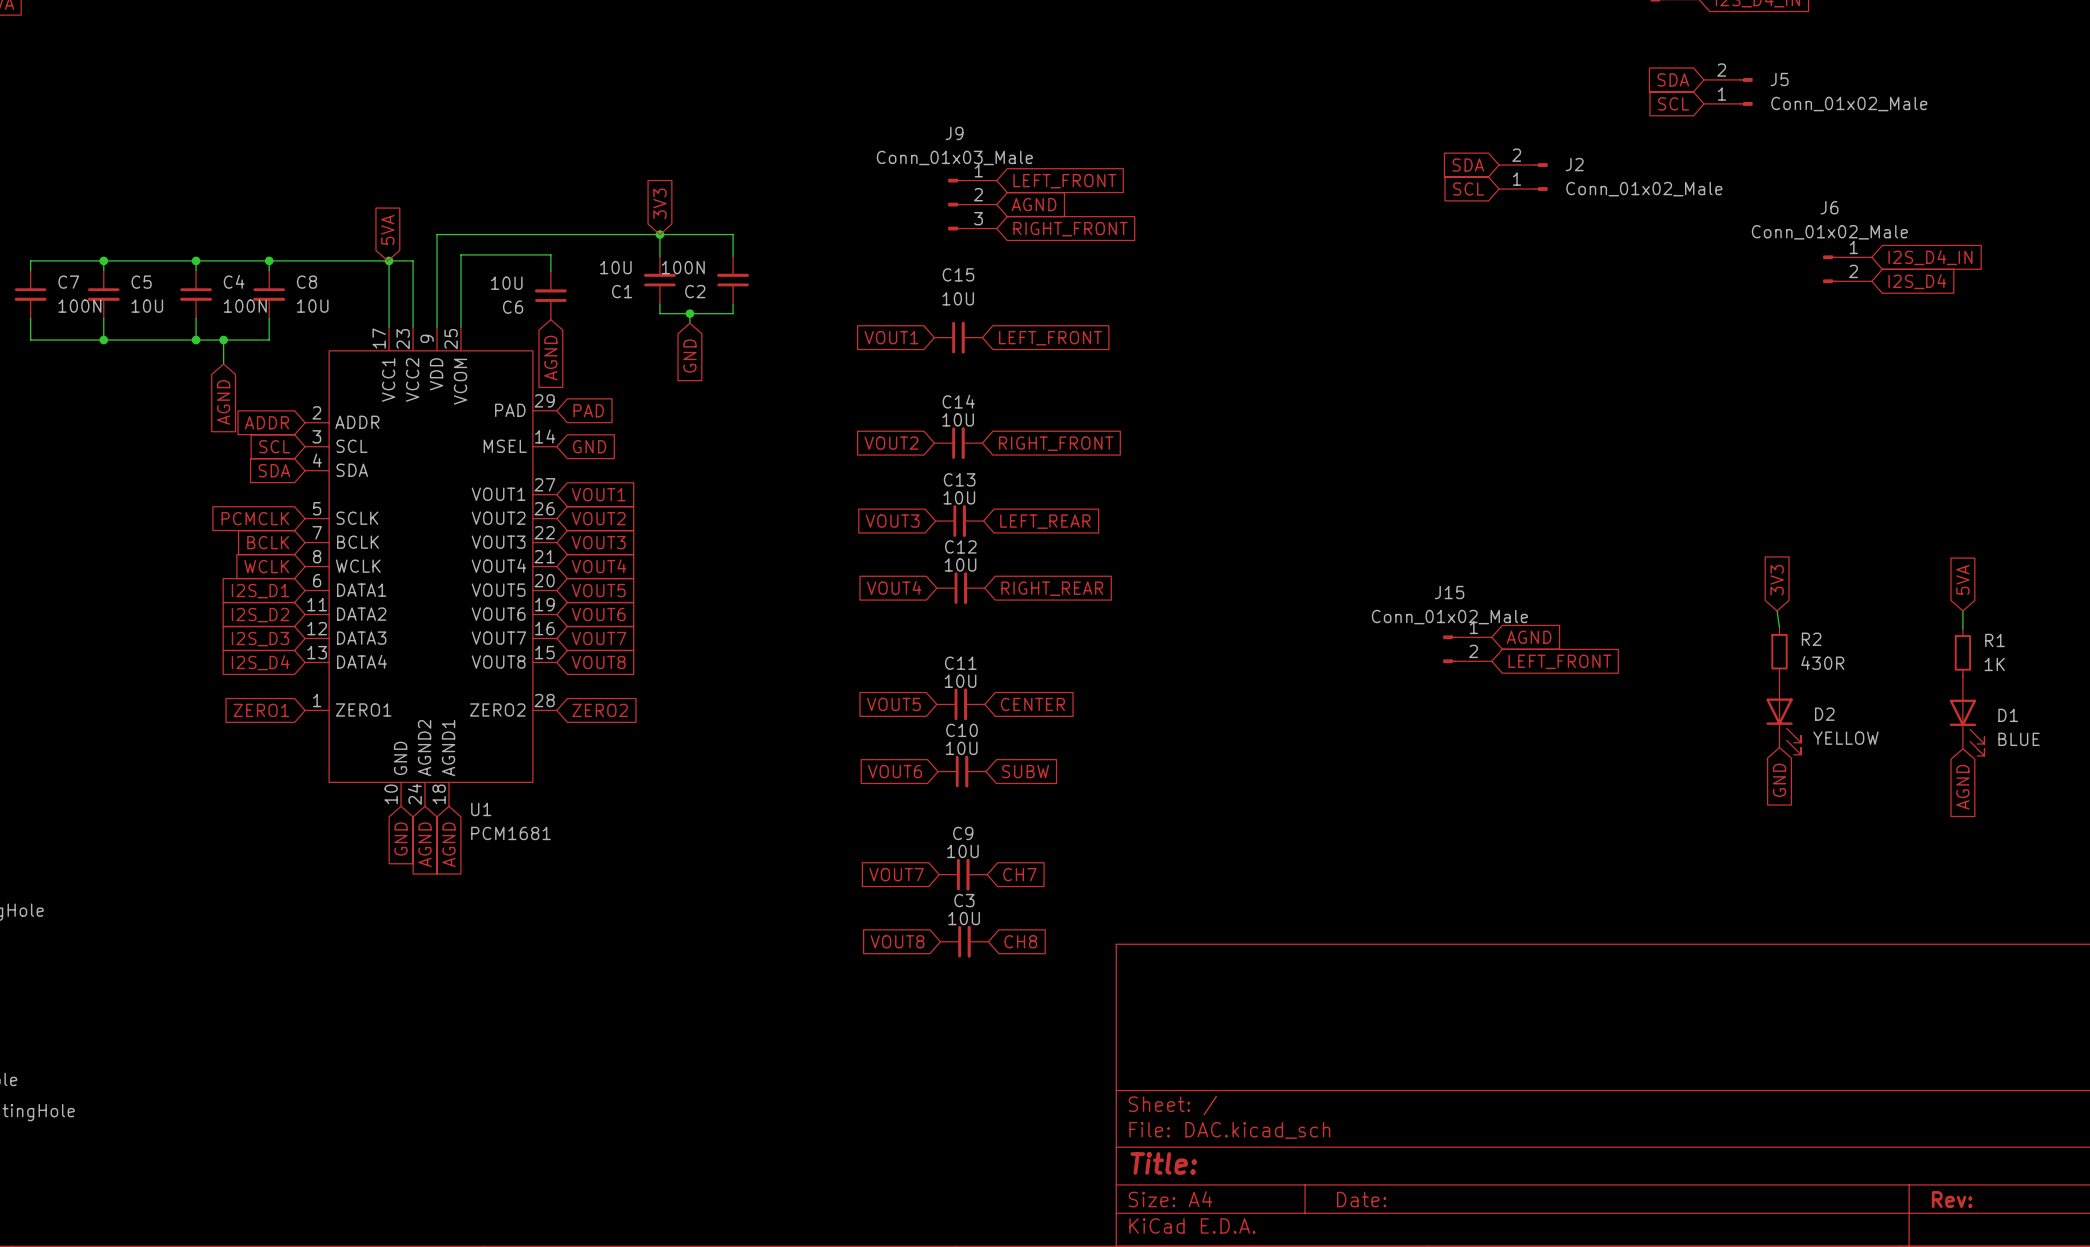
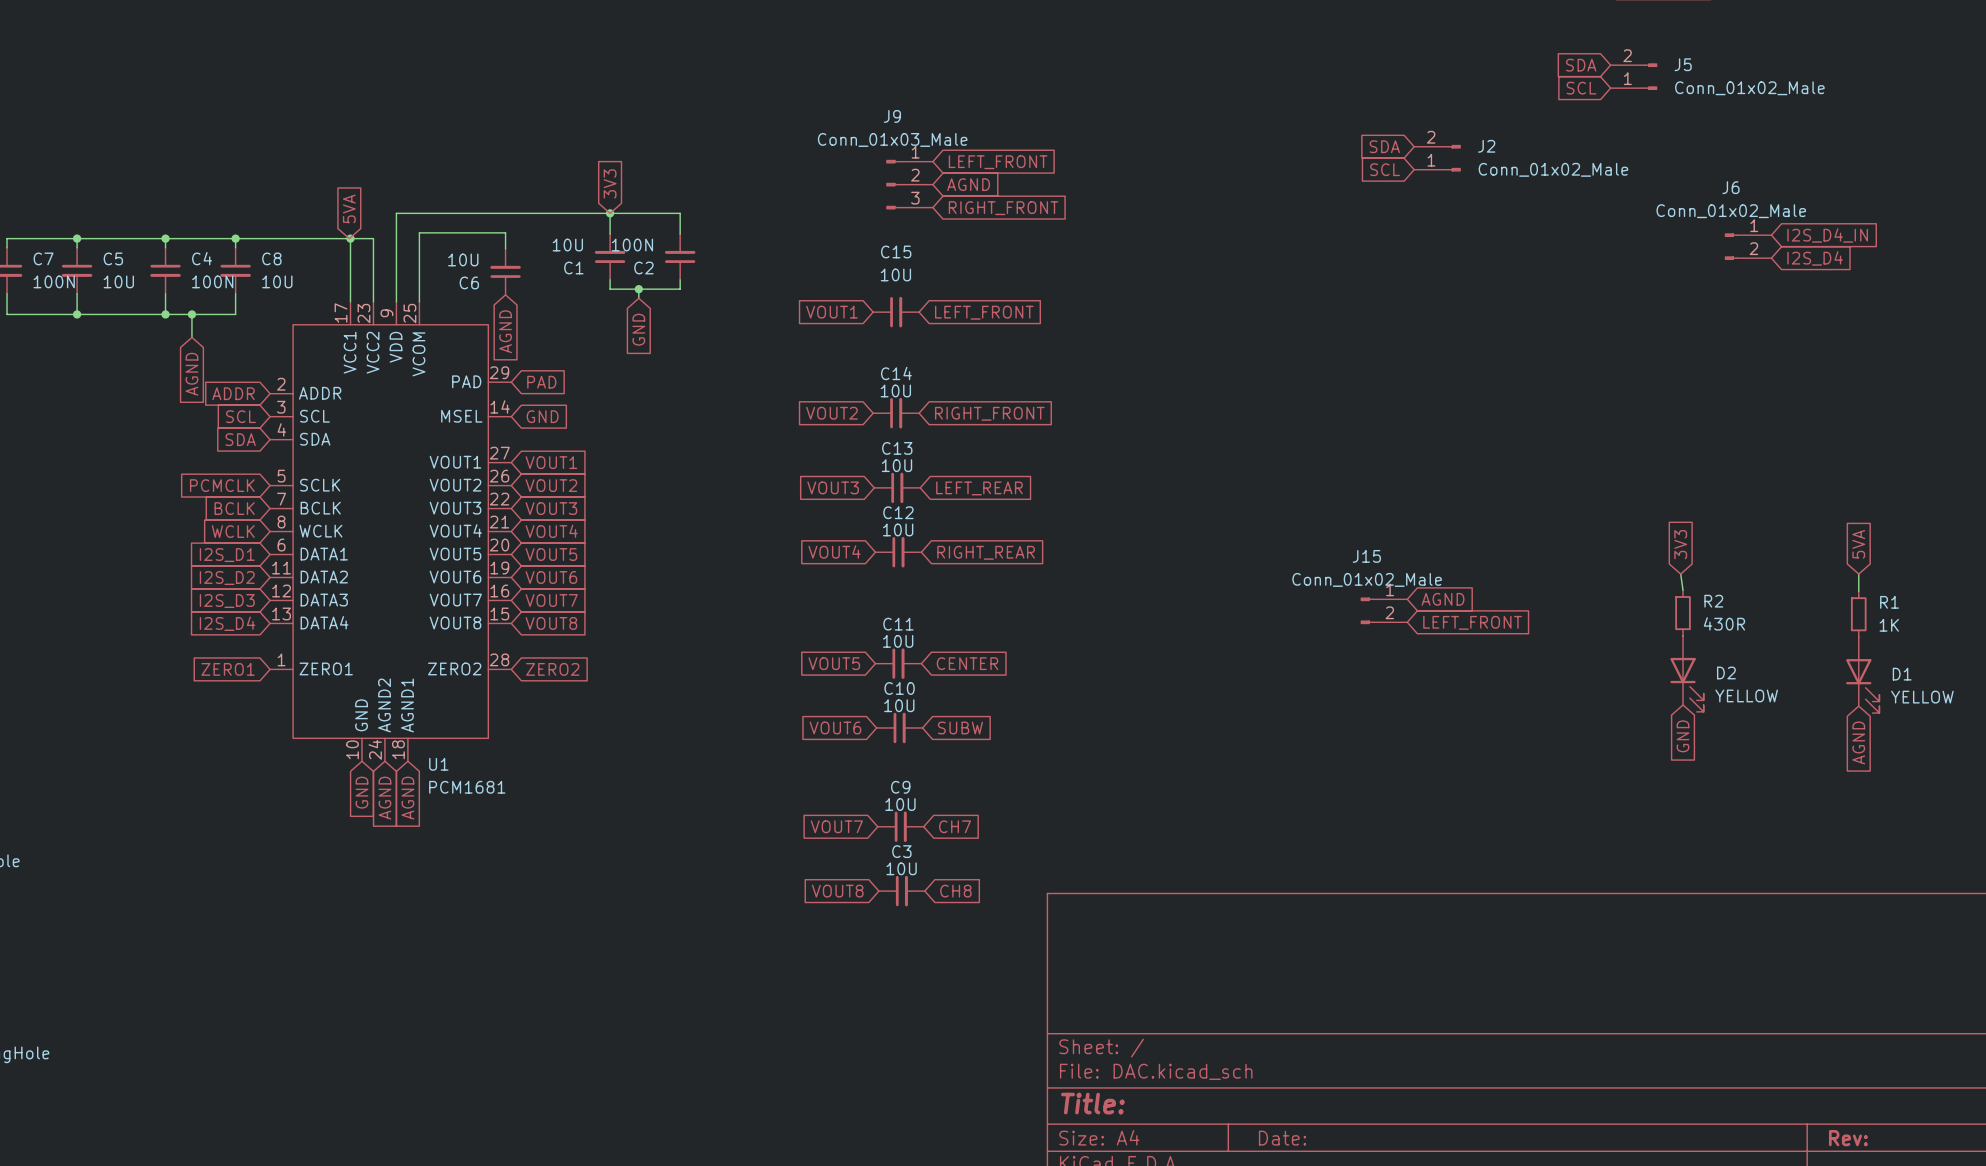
D1 value: BLUE (2019, 739) -> YELLOW (1922, 697)

